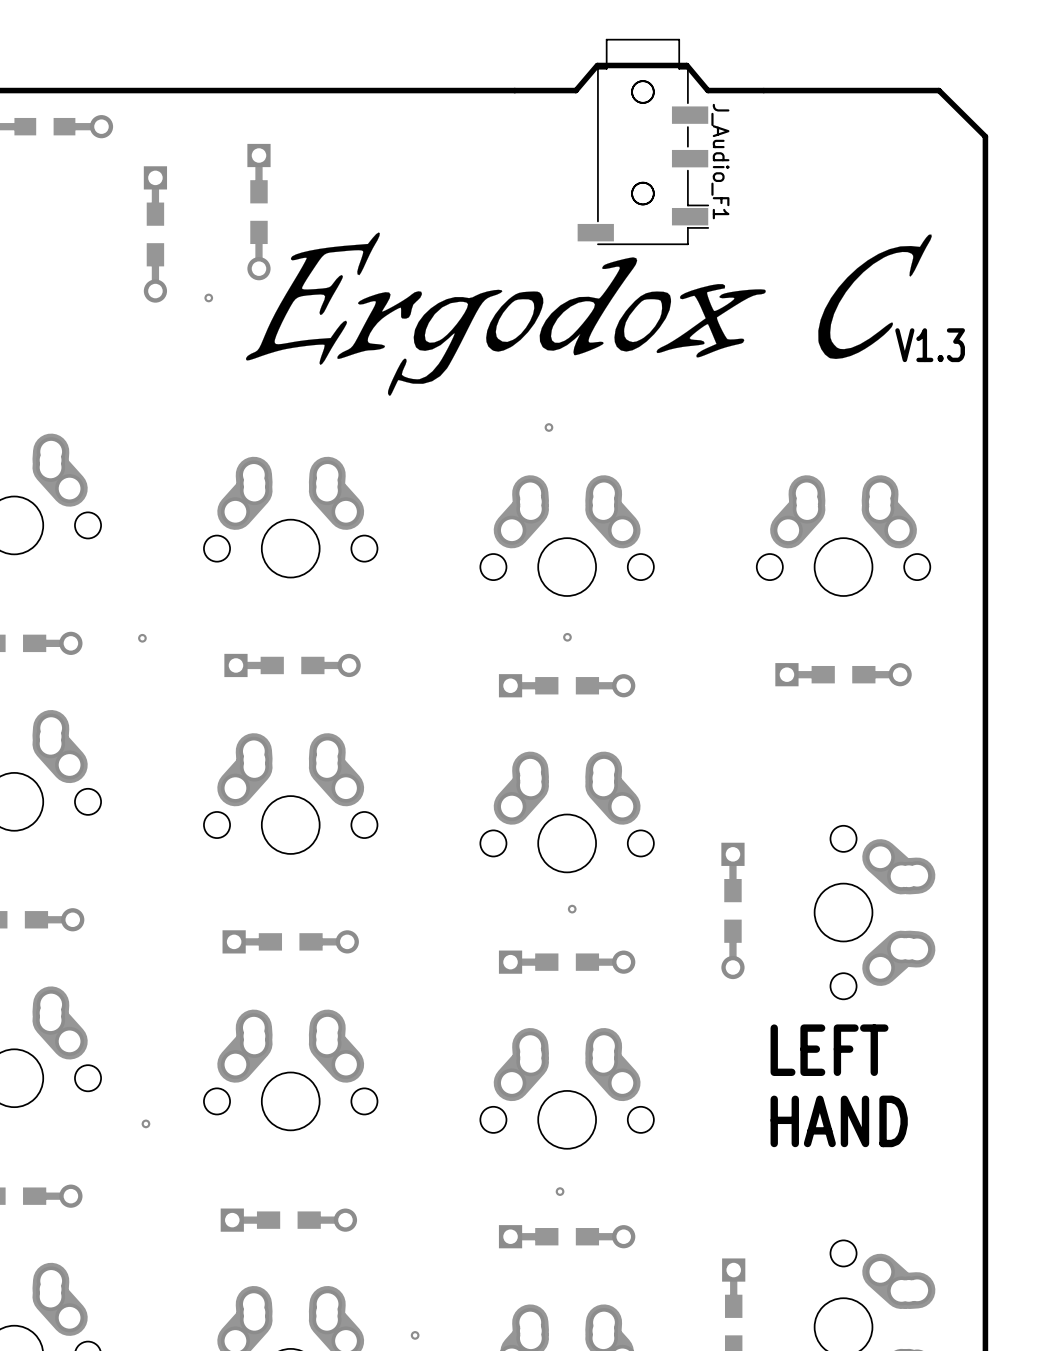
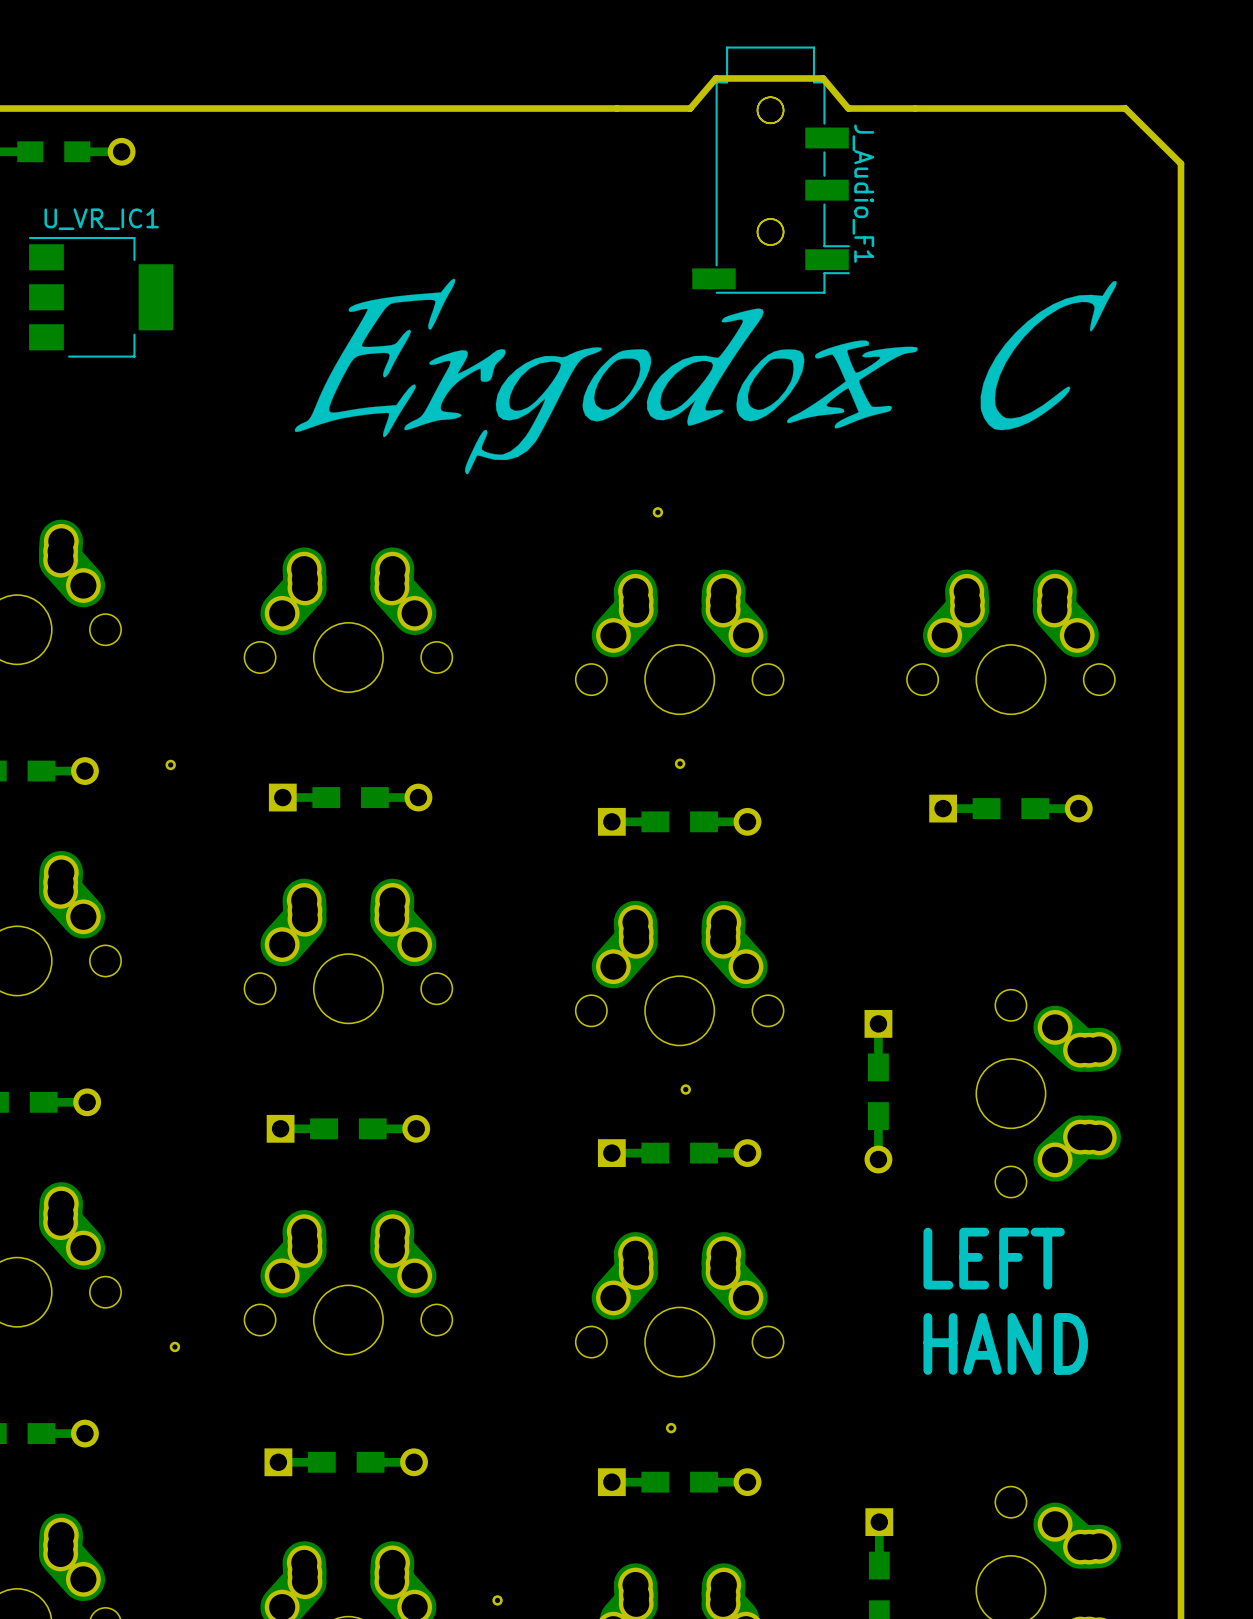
part: (258, 212) -> none
part: (155, 234) -> none
U_VR_IC1: none -> (101, 297)
part: (208, 297) -> none
text: V1.3 (930, 345) -> none

